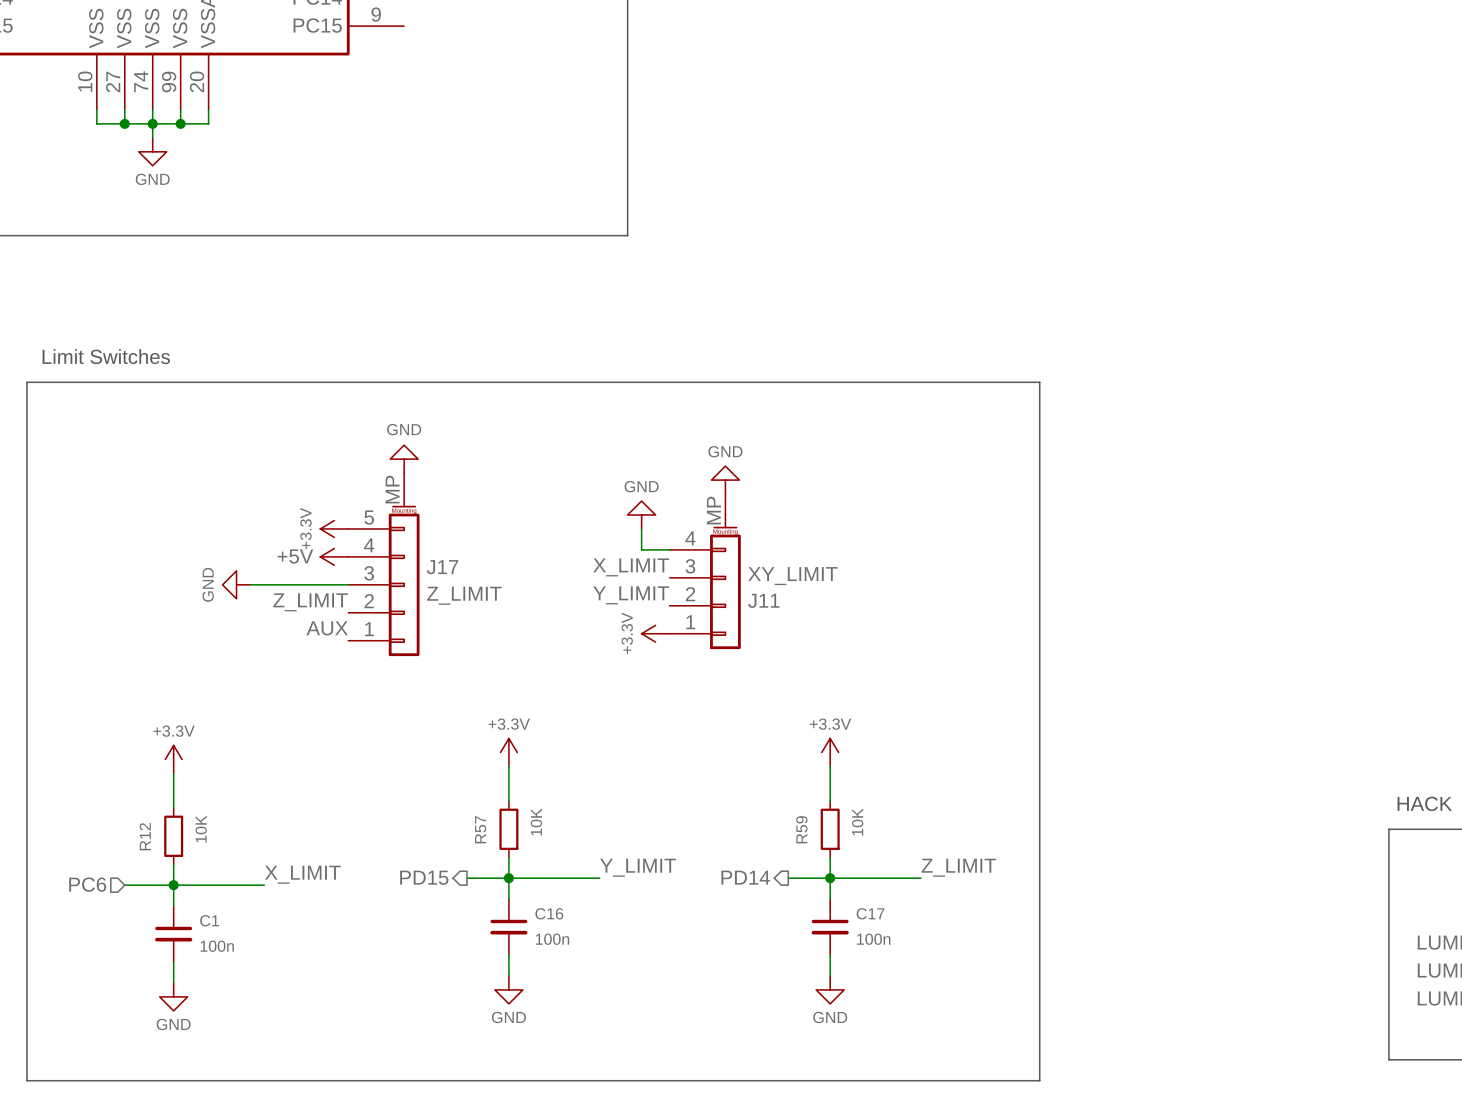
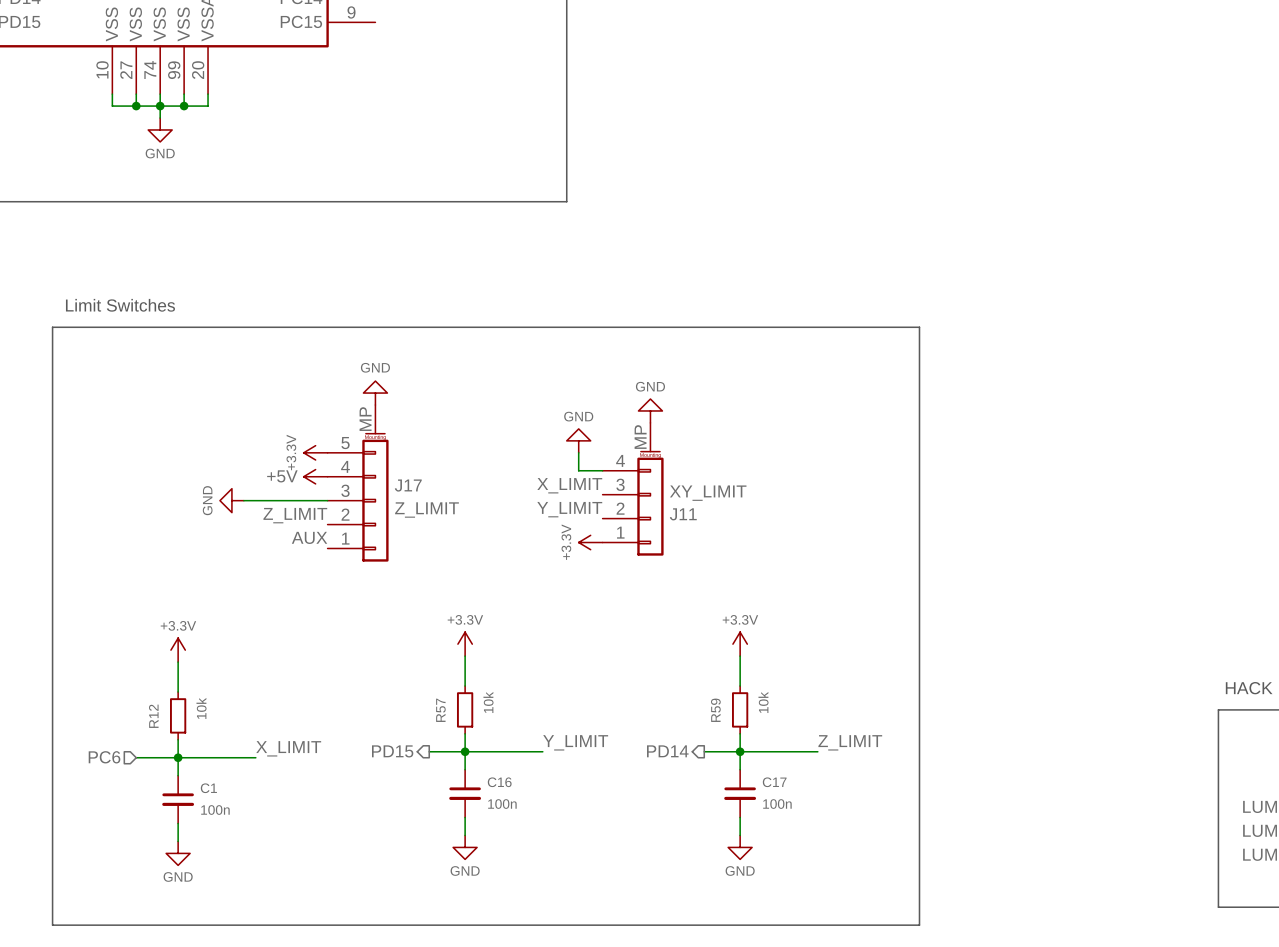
R57 value: 10K (536, 822) -> 10k (488, 702)
R59 value: 10K (857, 822) -> 10k (763, 702)
R12 value: 10K (201, 829) -> 10k (201, 708)

